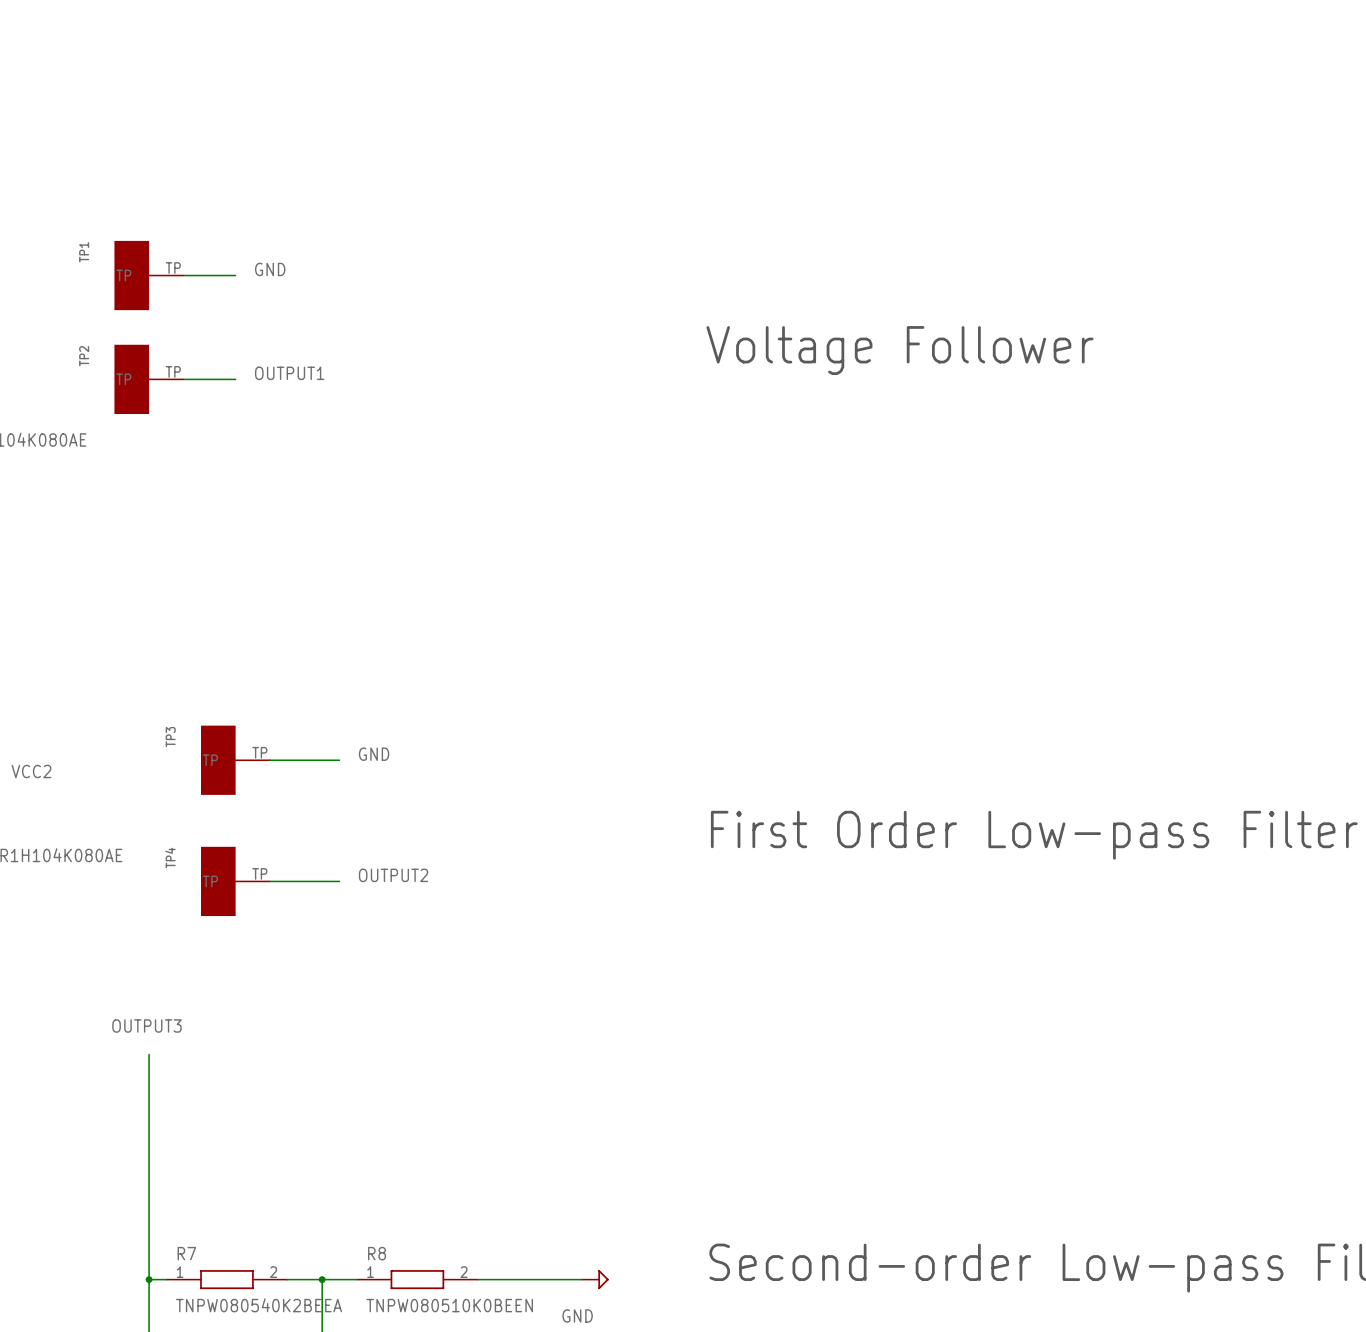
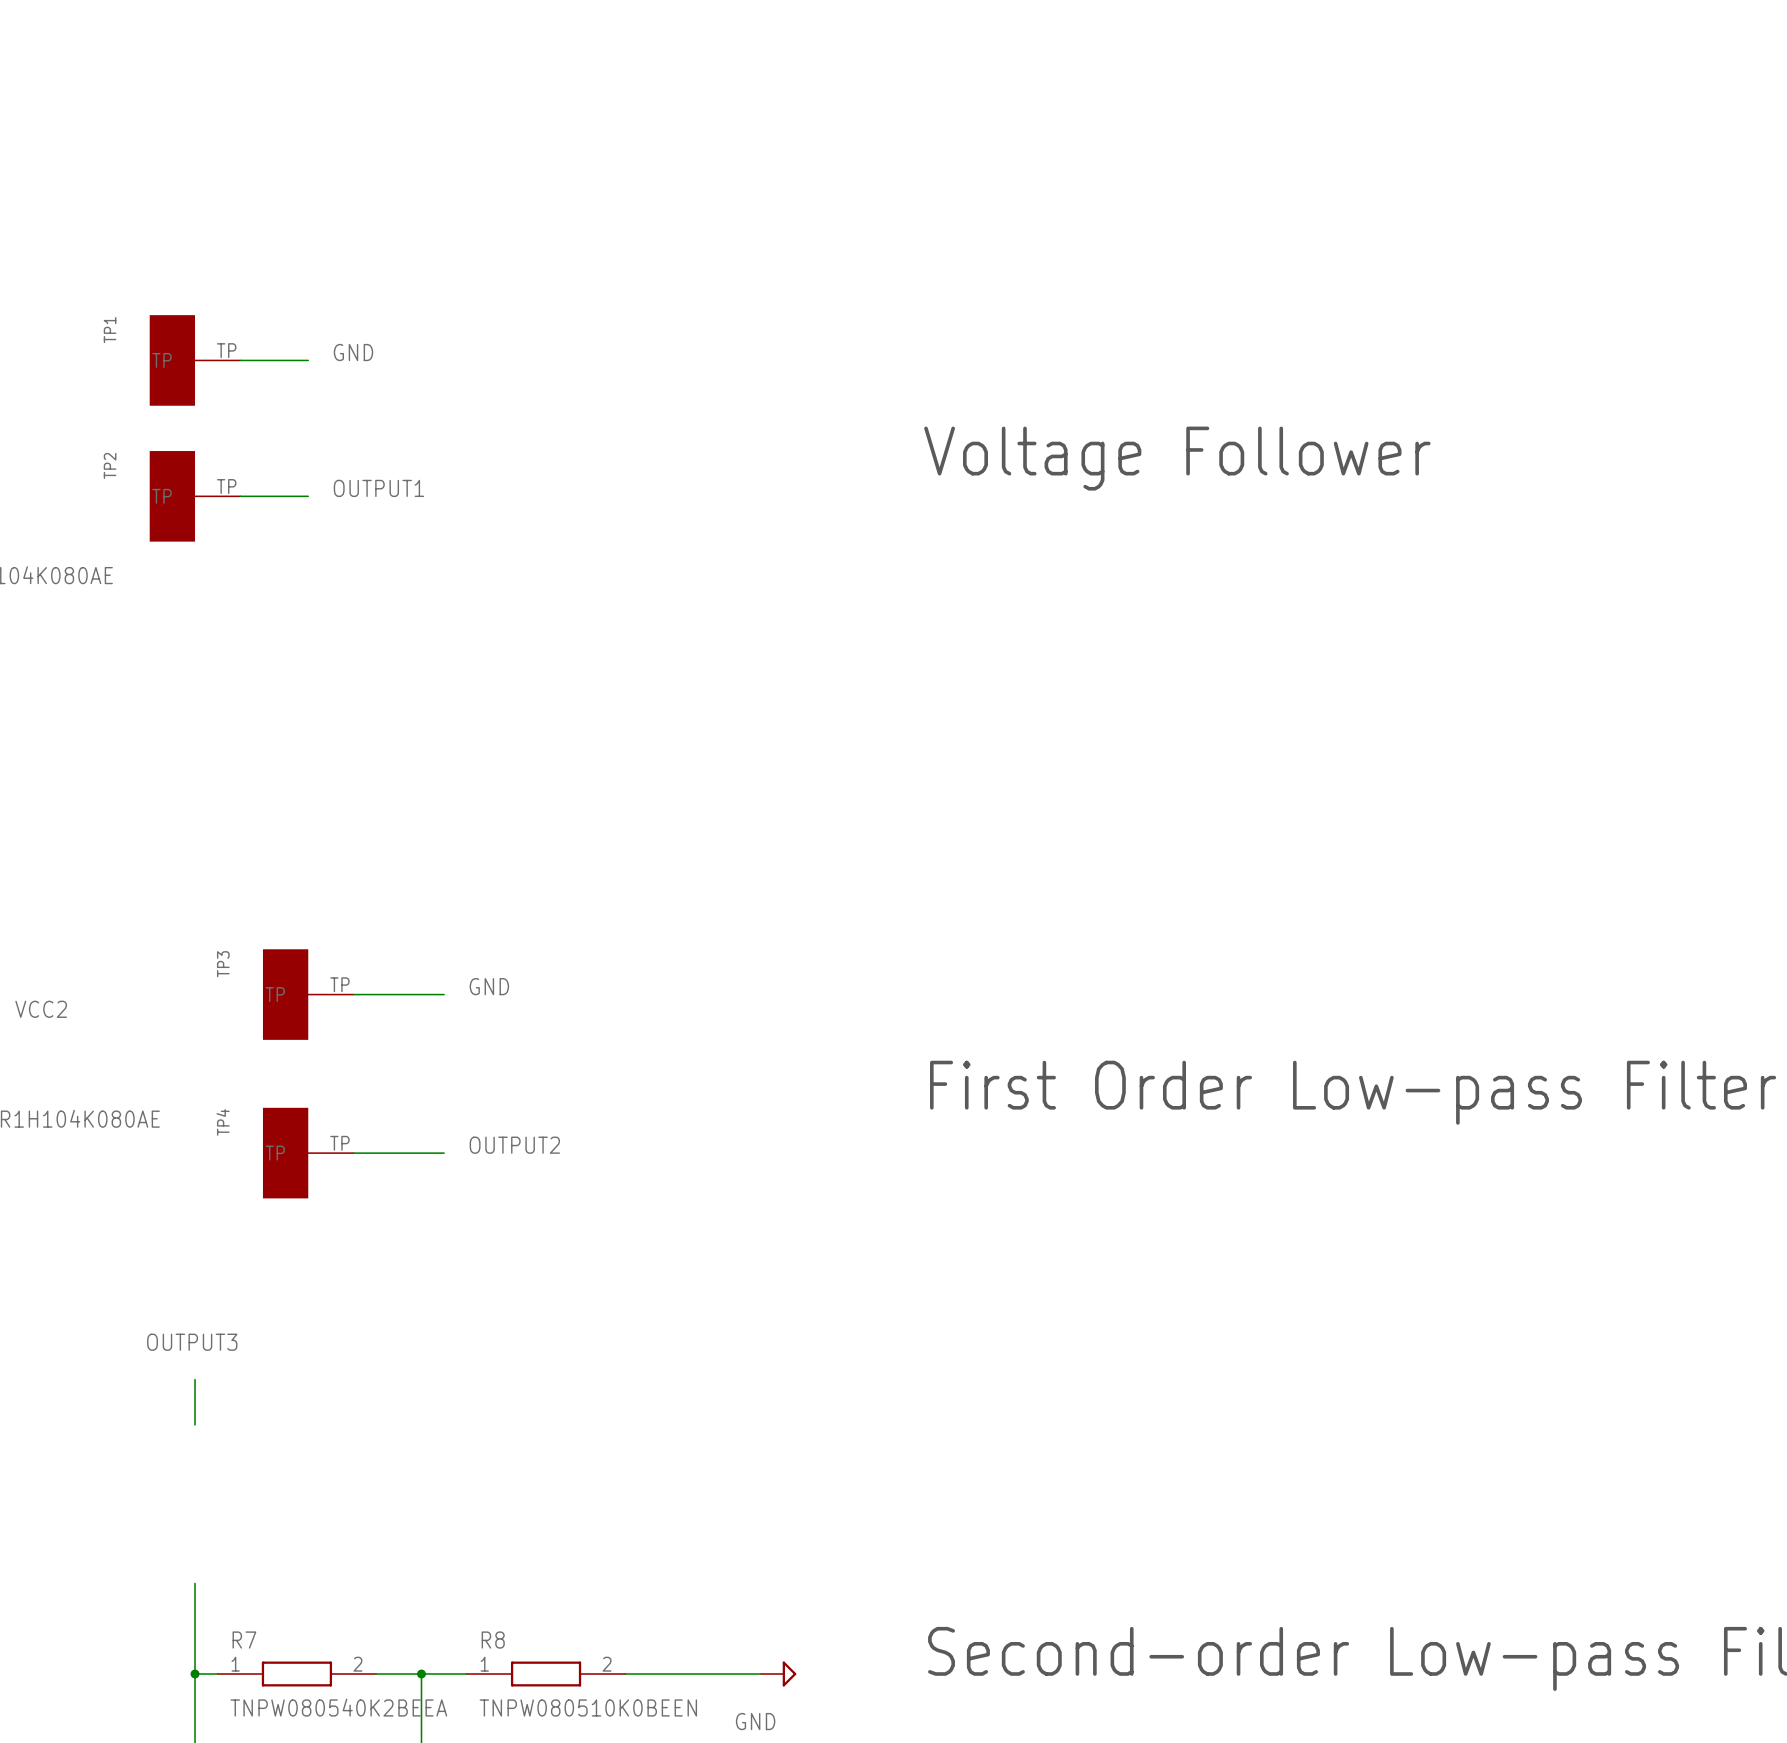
wire: (149, 1089) (149, 1210) -> none

